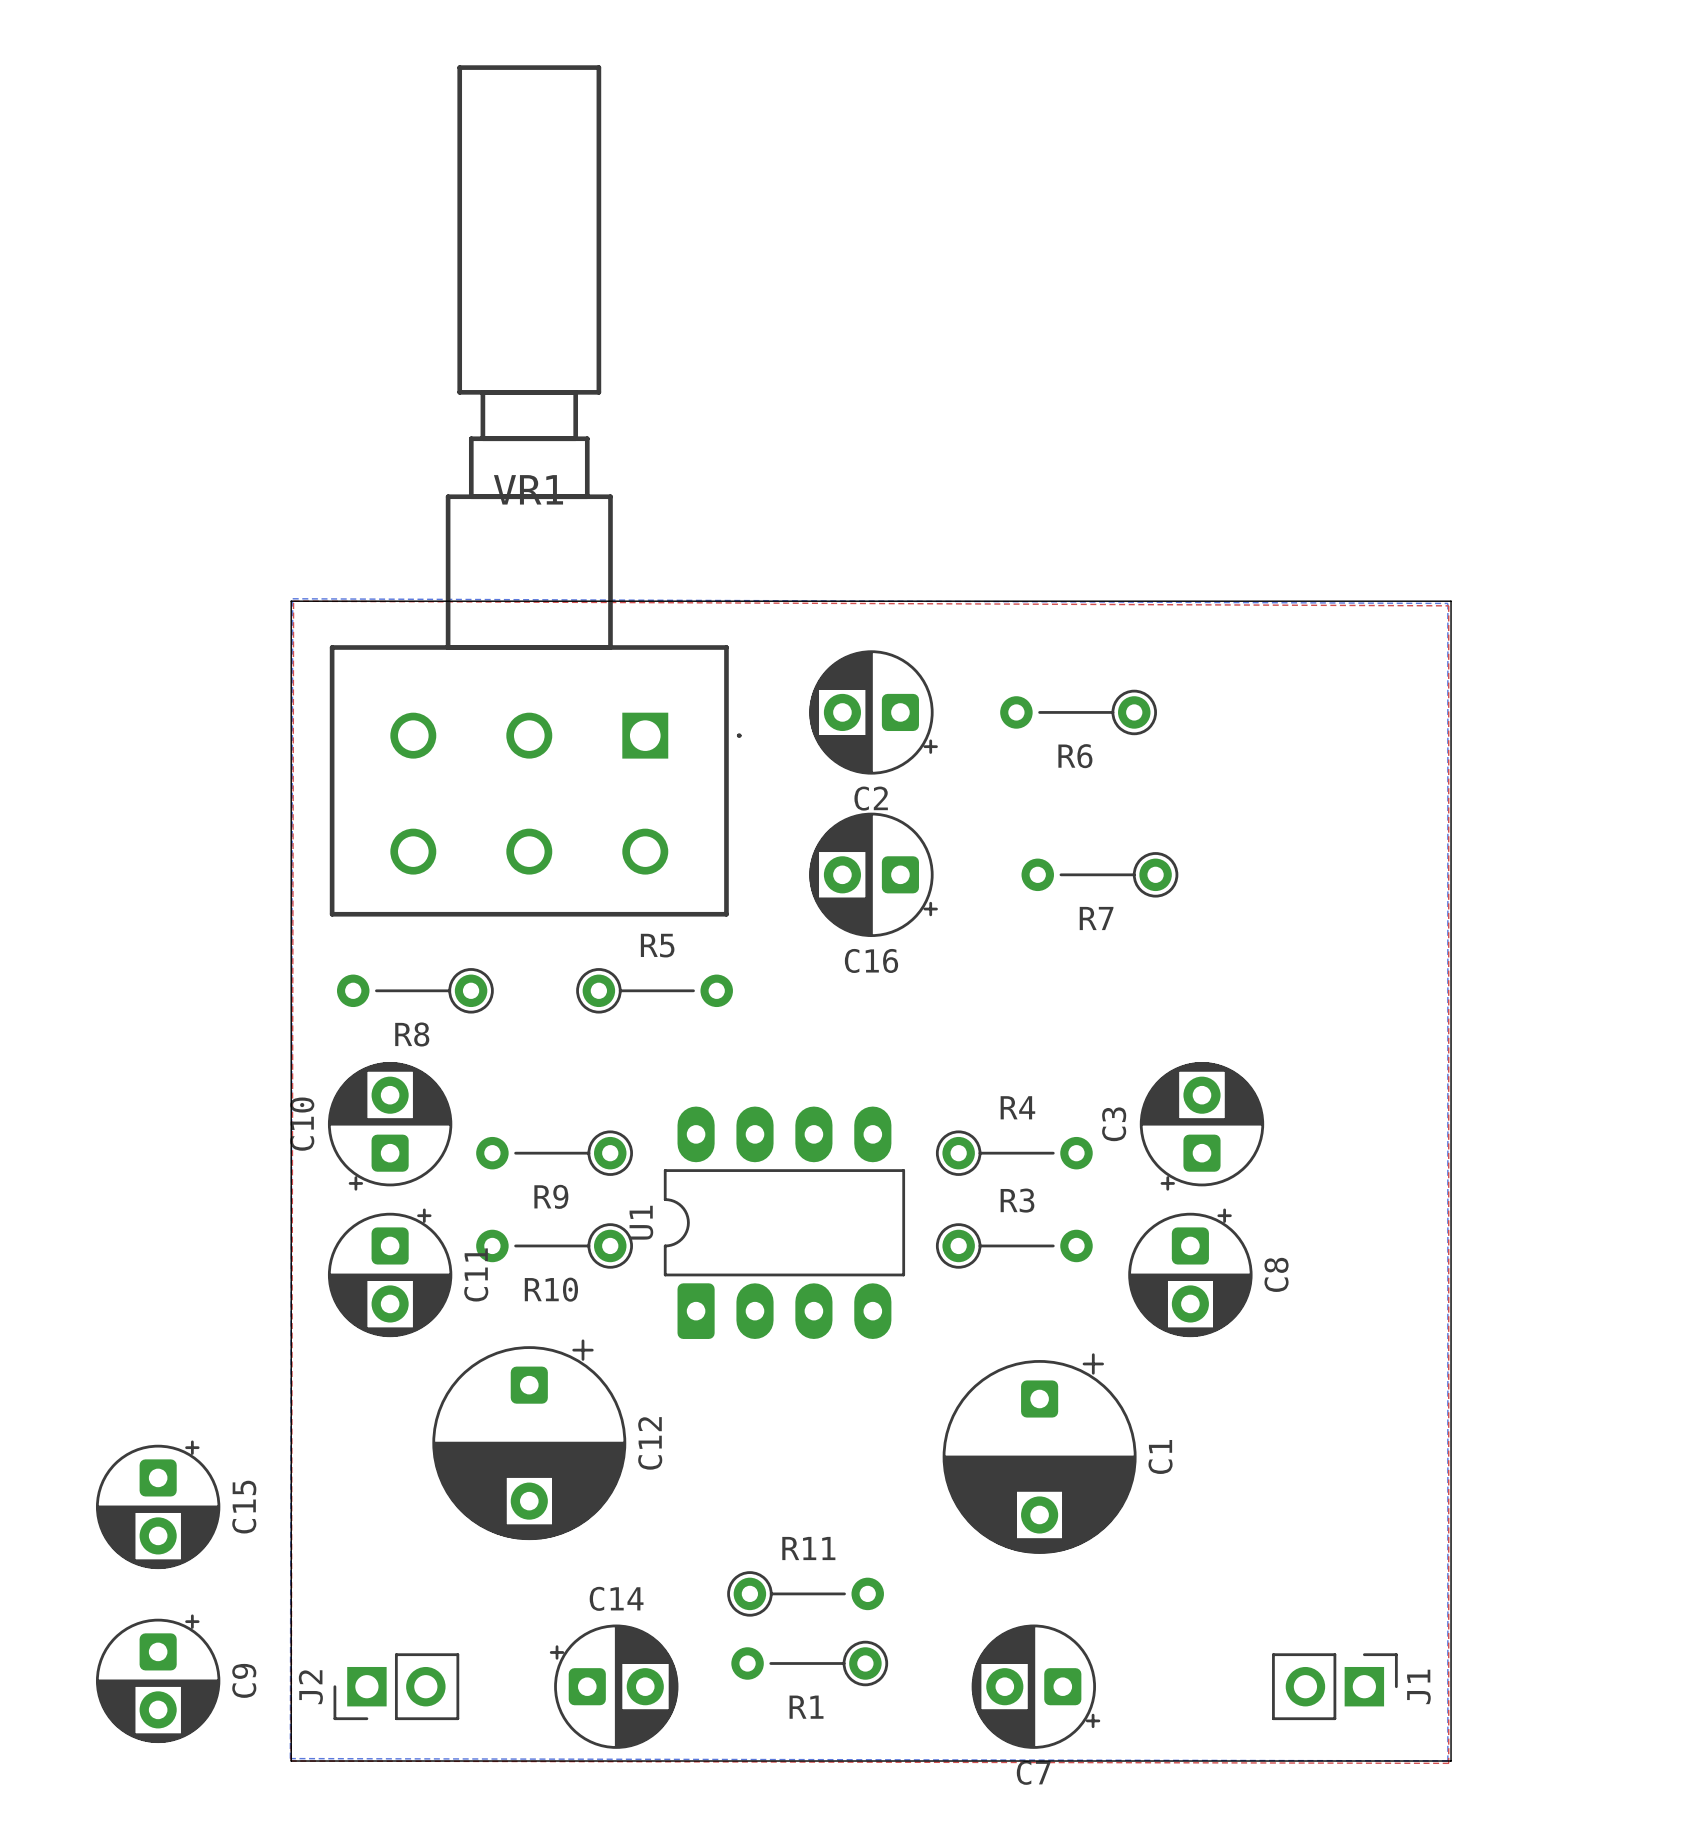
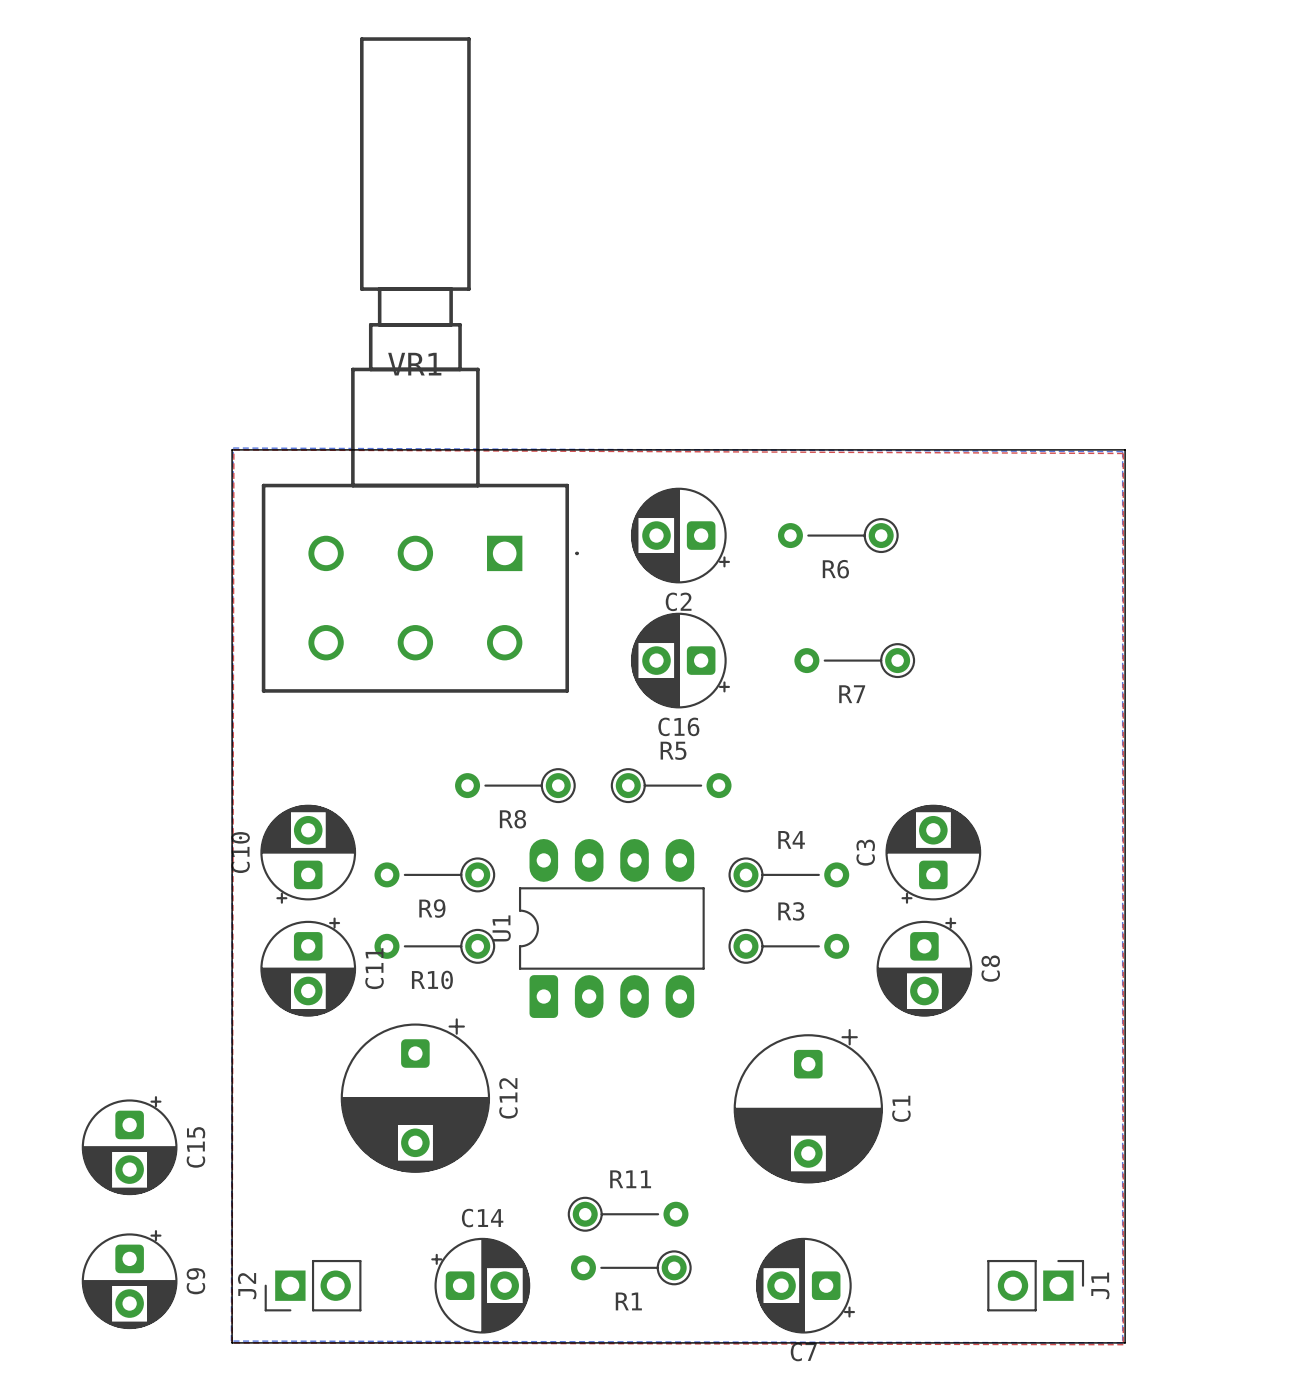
R8 position: (415, 990) -> (515, 785)
R5 position: (654, 990) -> (671, 785)

